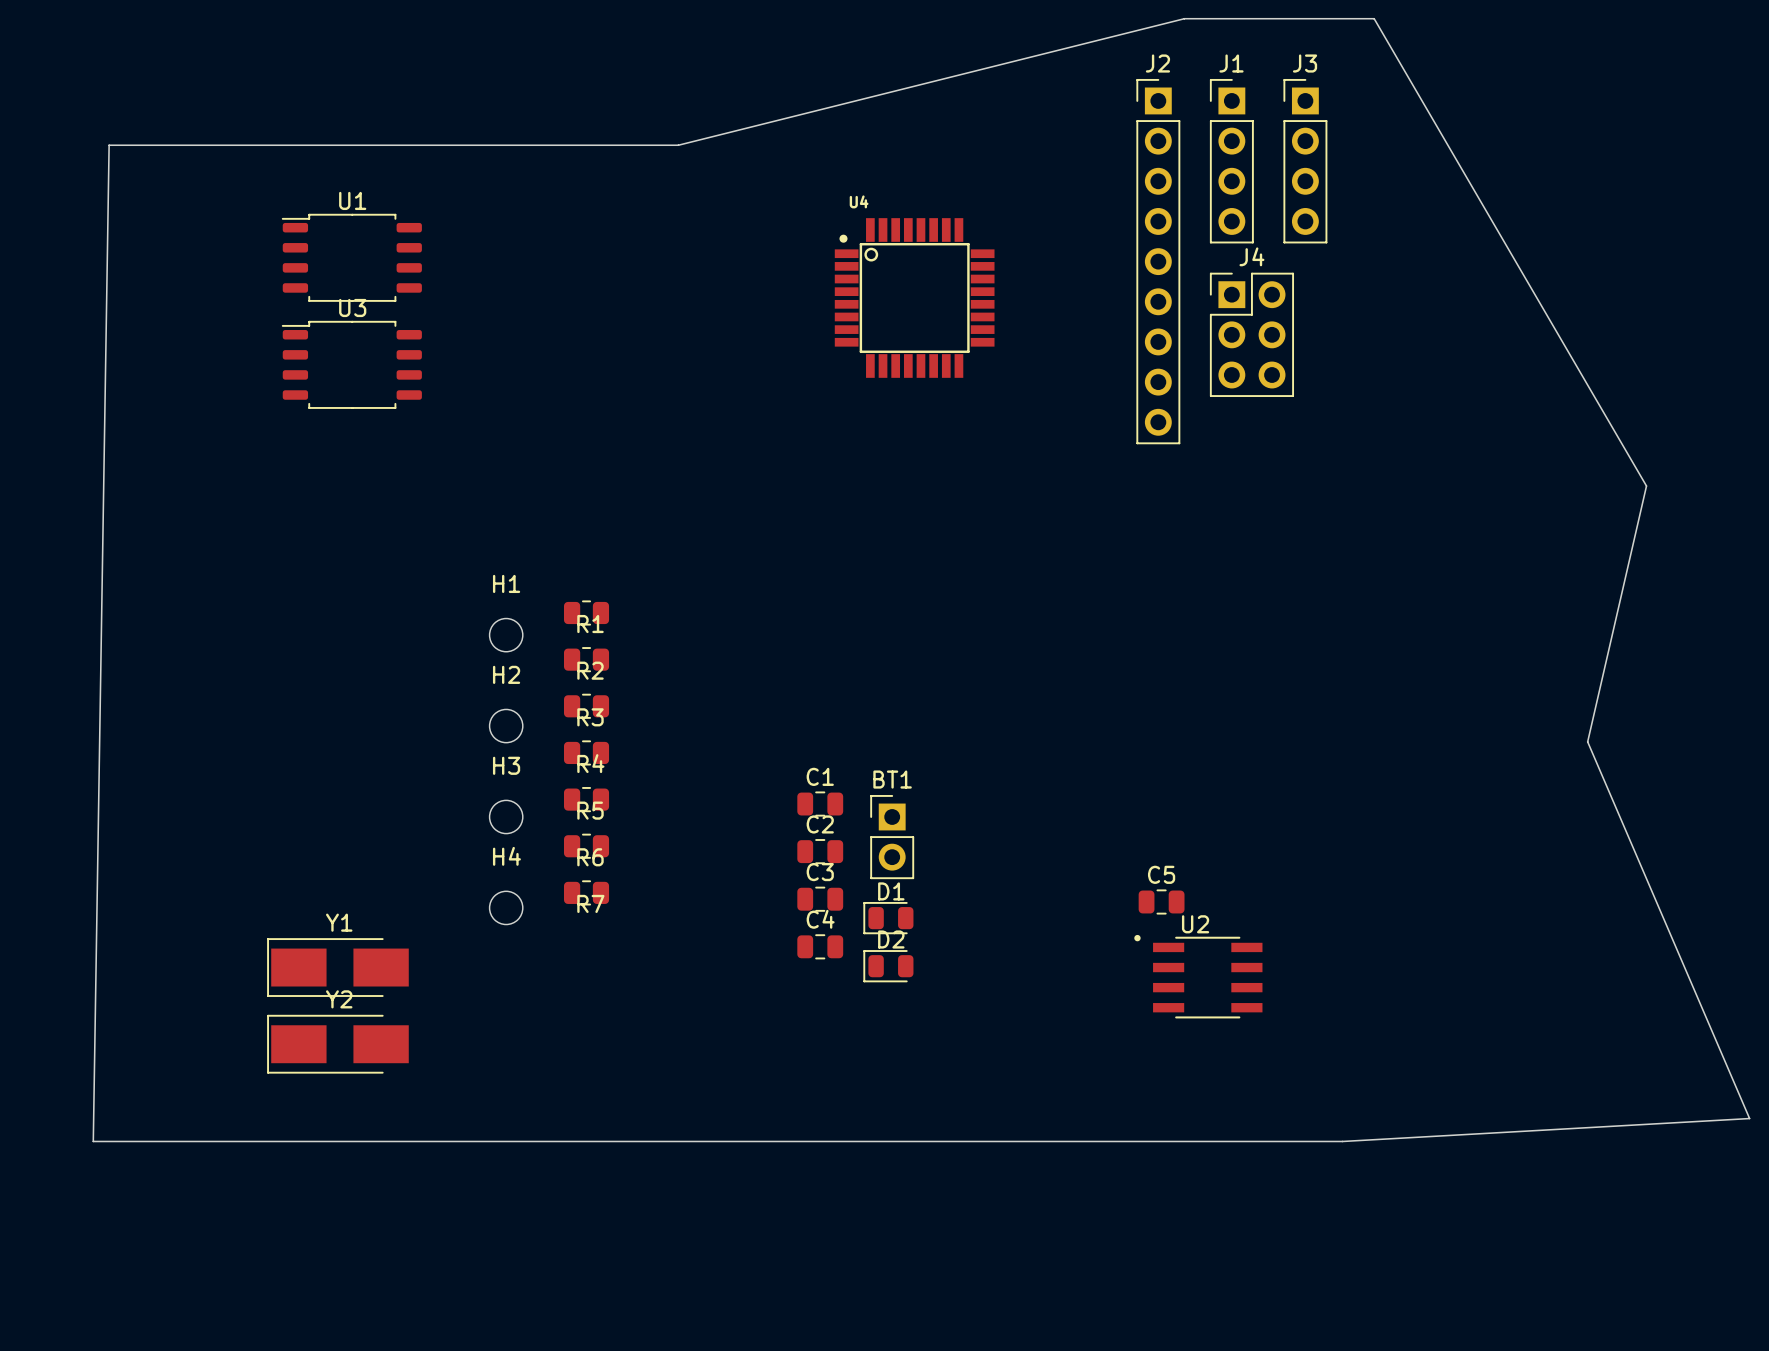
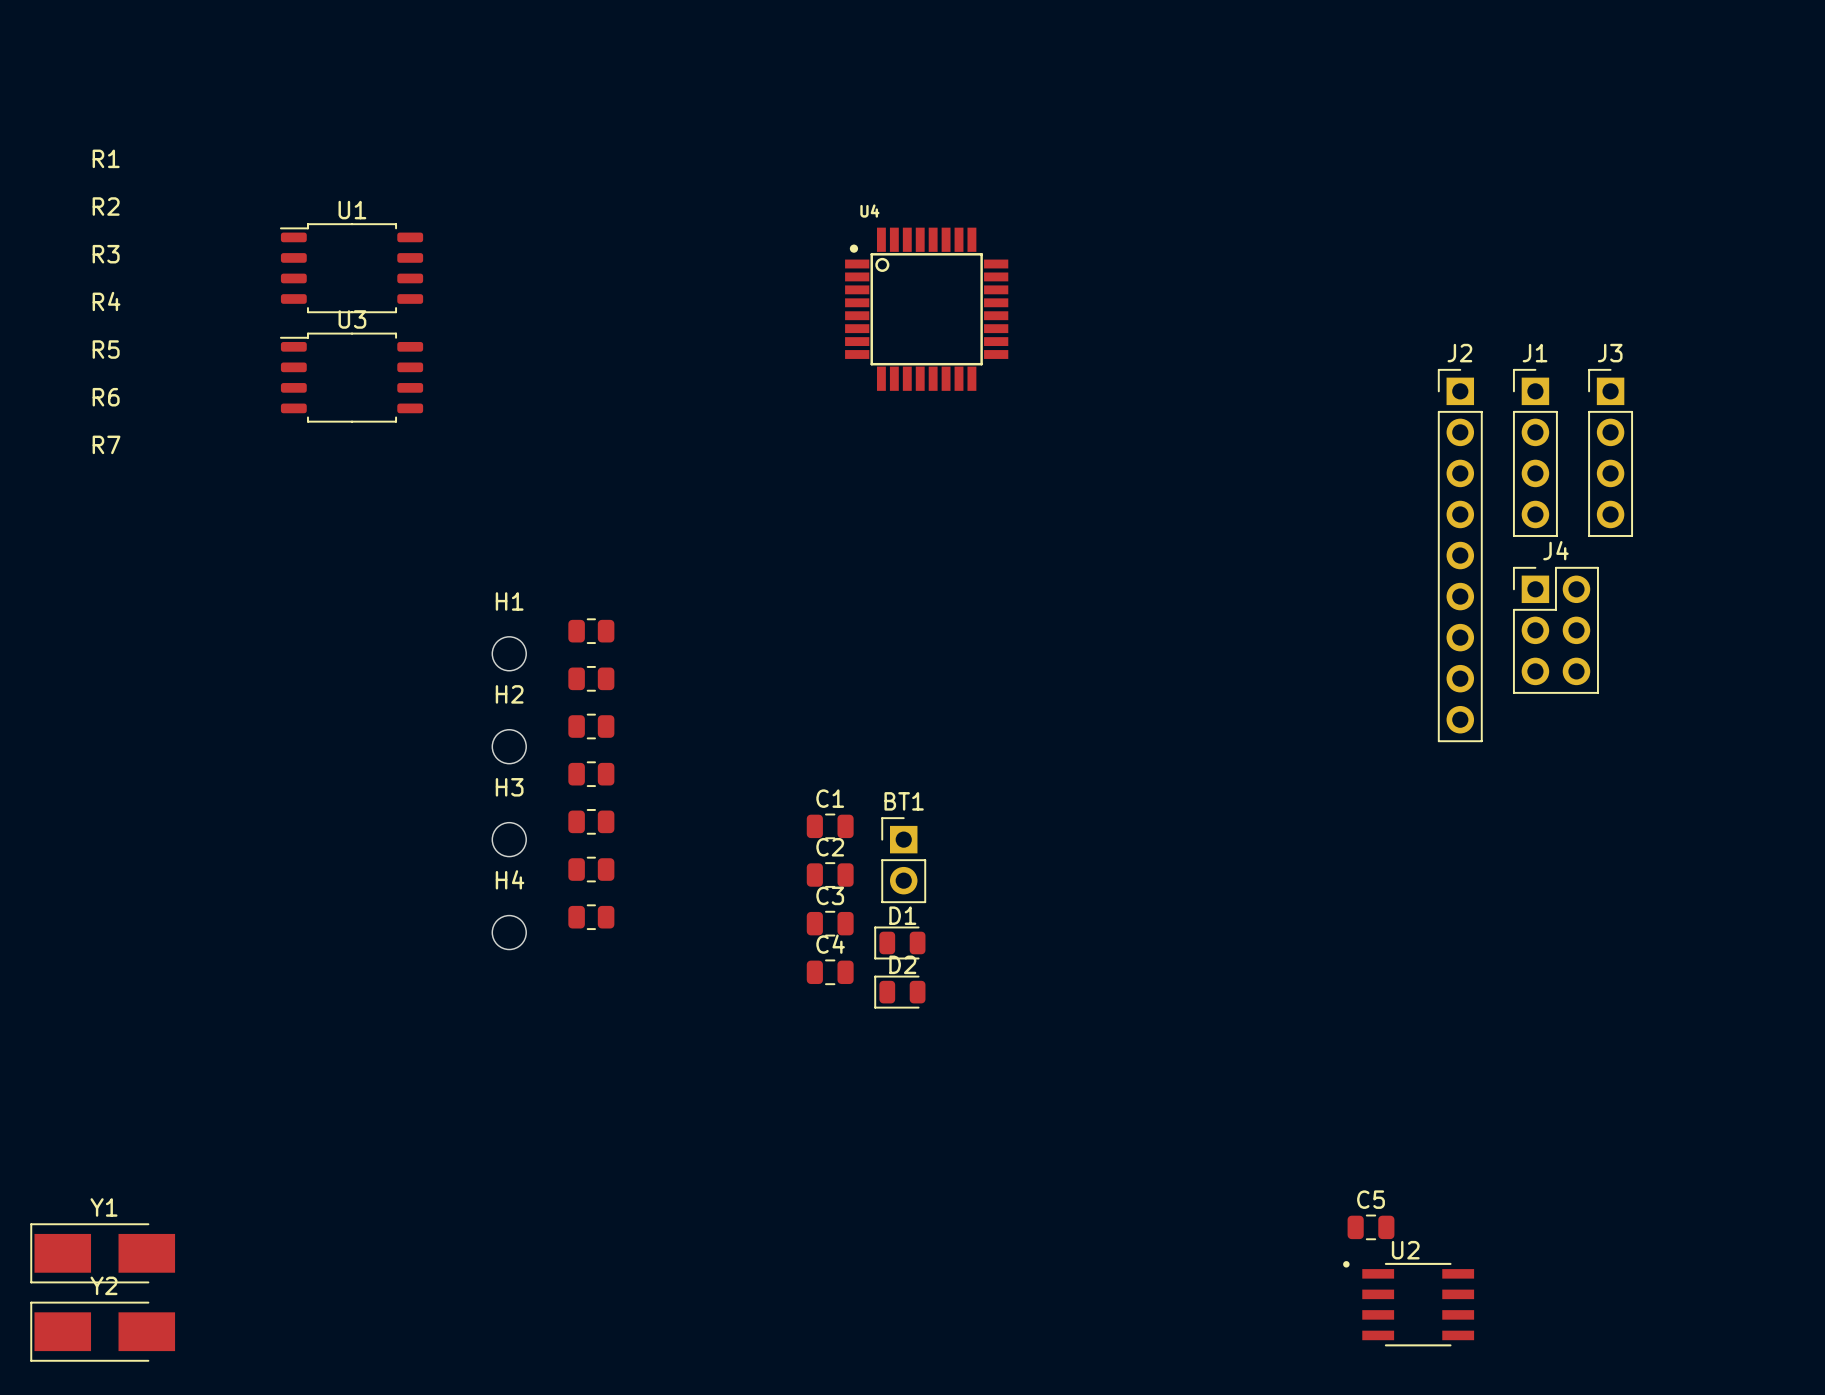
board edge: (1184, 18) (678, 145) (109, 145) (93, 1141) (1342, 1141) (1749, 1118) (1587, 741) (1646, 486) (1374, 18) (1184, 18) -> none
J1 position: (1231, 161) -> (1535, 452)
J3 position: (1305, 161) -> (1610, 452)
J2 position: (1158, 261) -> (1460, 555)
J4 position: (1251, 334) -> (1555, 630)
R1 name position: R1 (590, 624) -> R1 (106, 158)
R2 name position: R2 (590, 670) -> R2 (106, 206)
R3 name position: R3 (590, 717) -> R3 (106, 254)
R4 name position: R4 (590, 763) -> R4 (106, 301)
R5 name position: R5 (590, 810) -> R5 (106, 349)
R6 name position: R6 (590, 857) -> R6 (106, 397)
C5 position: (1161, 901) -> (1371, 1227)
R7 name position: R7 (590, 903) -> R7 (106, 444)
Y1 position: (337, 967) -> (102, 1253)
U2 position: (1198, 976) -> (1408, 1303)
Y2 position: (337, 1044) -> (102, 1331)

